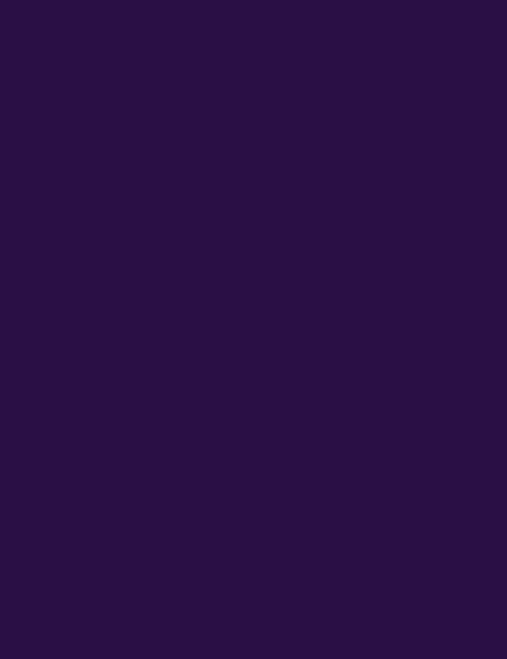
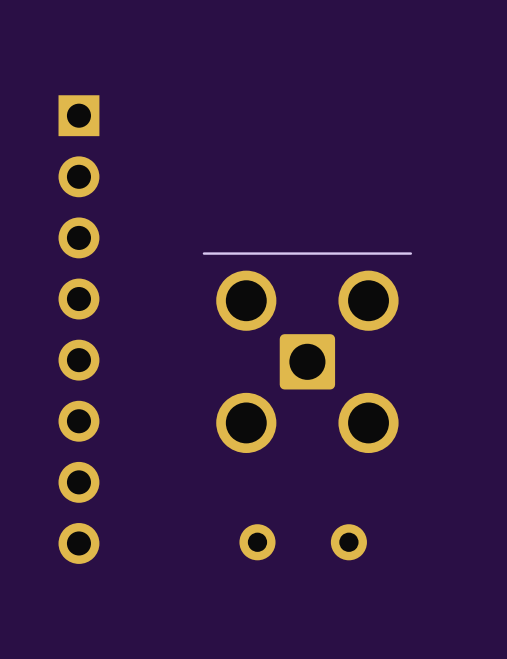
part: none -> (78, 329)
part: none -> (307, 352)
part: none -> (303, 542)

